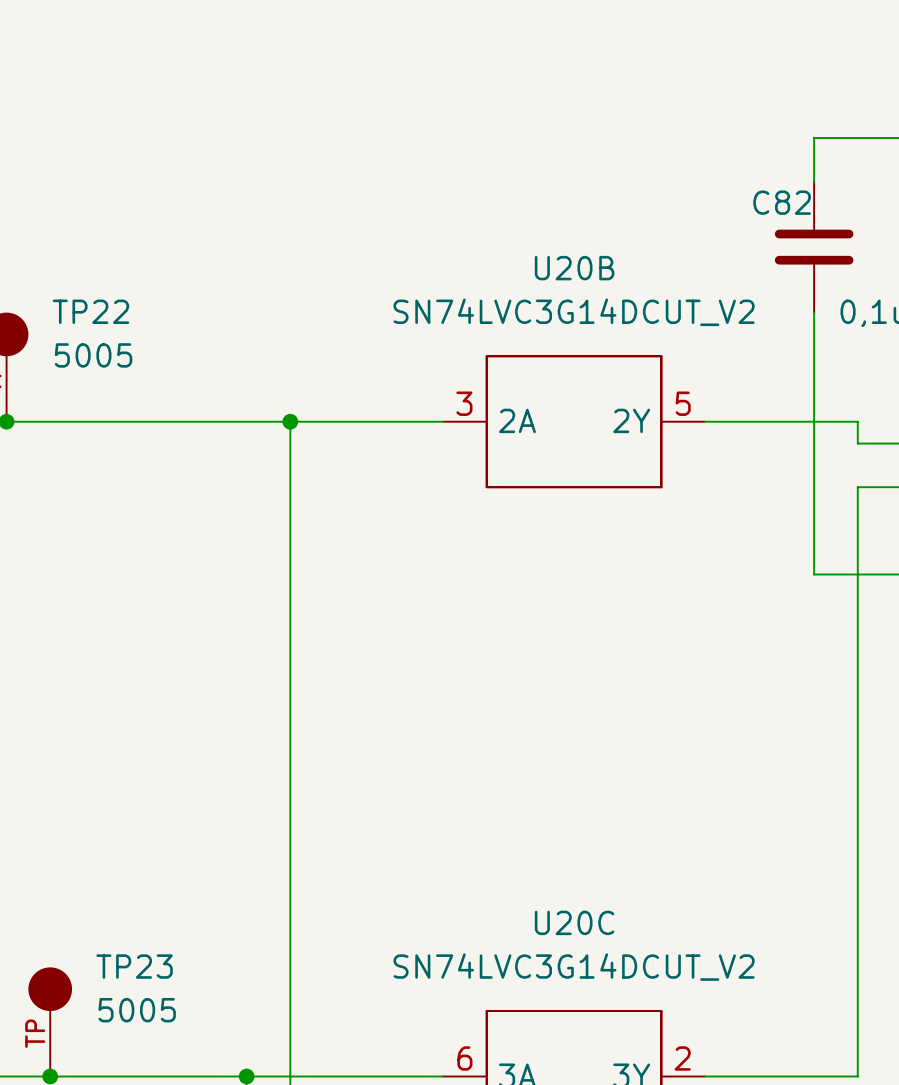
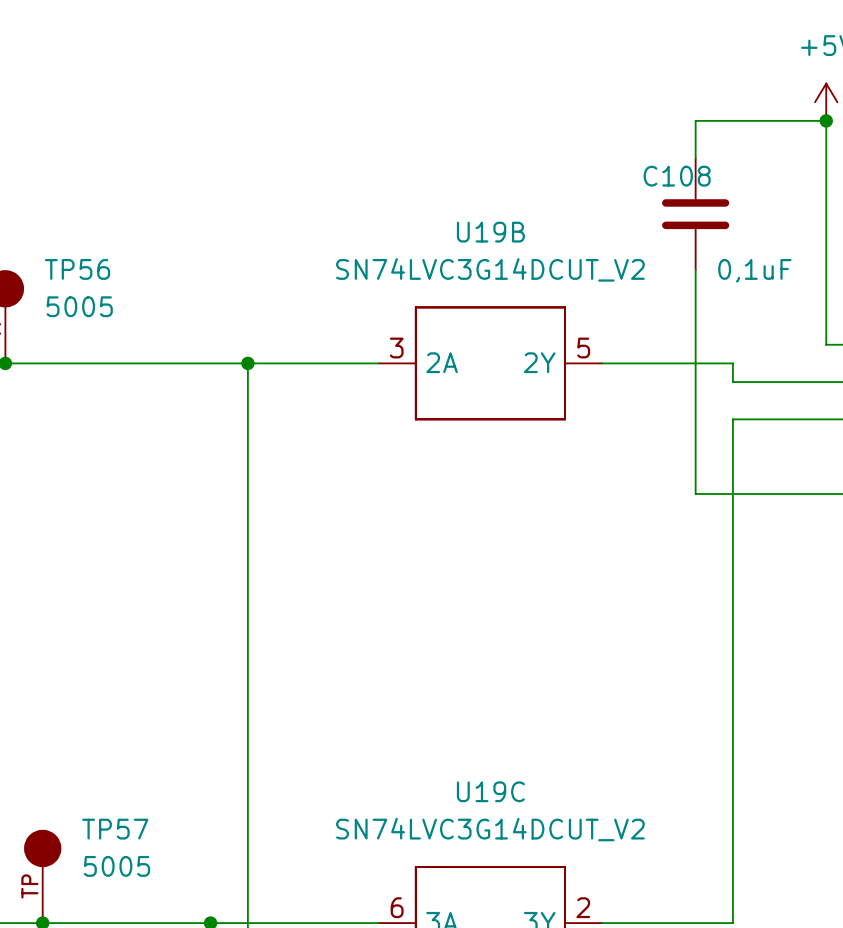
C82 name: C82 (782, 202) -> C108 (677, 176)
U20B name: U20B (574, 268) -> U19B (490, 232)
TP22 name: TP22 (90, 311) -> TP56 (77, 269)
U20C name: U20C (574, 922) -> U19C (490, 791)
TP23 name: TP23 (134, 966) -> TP57 (115, 829)

